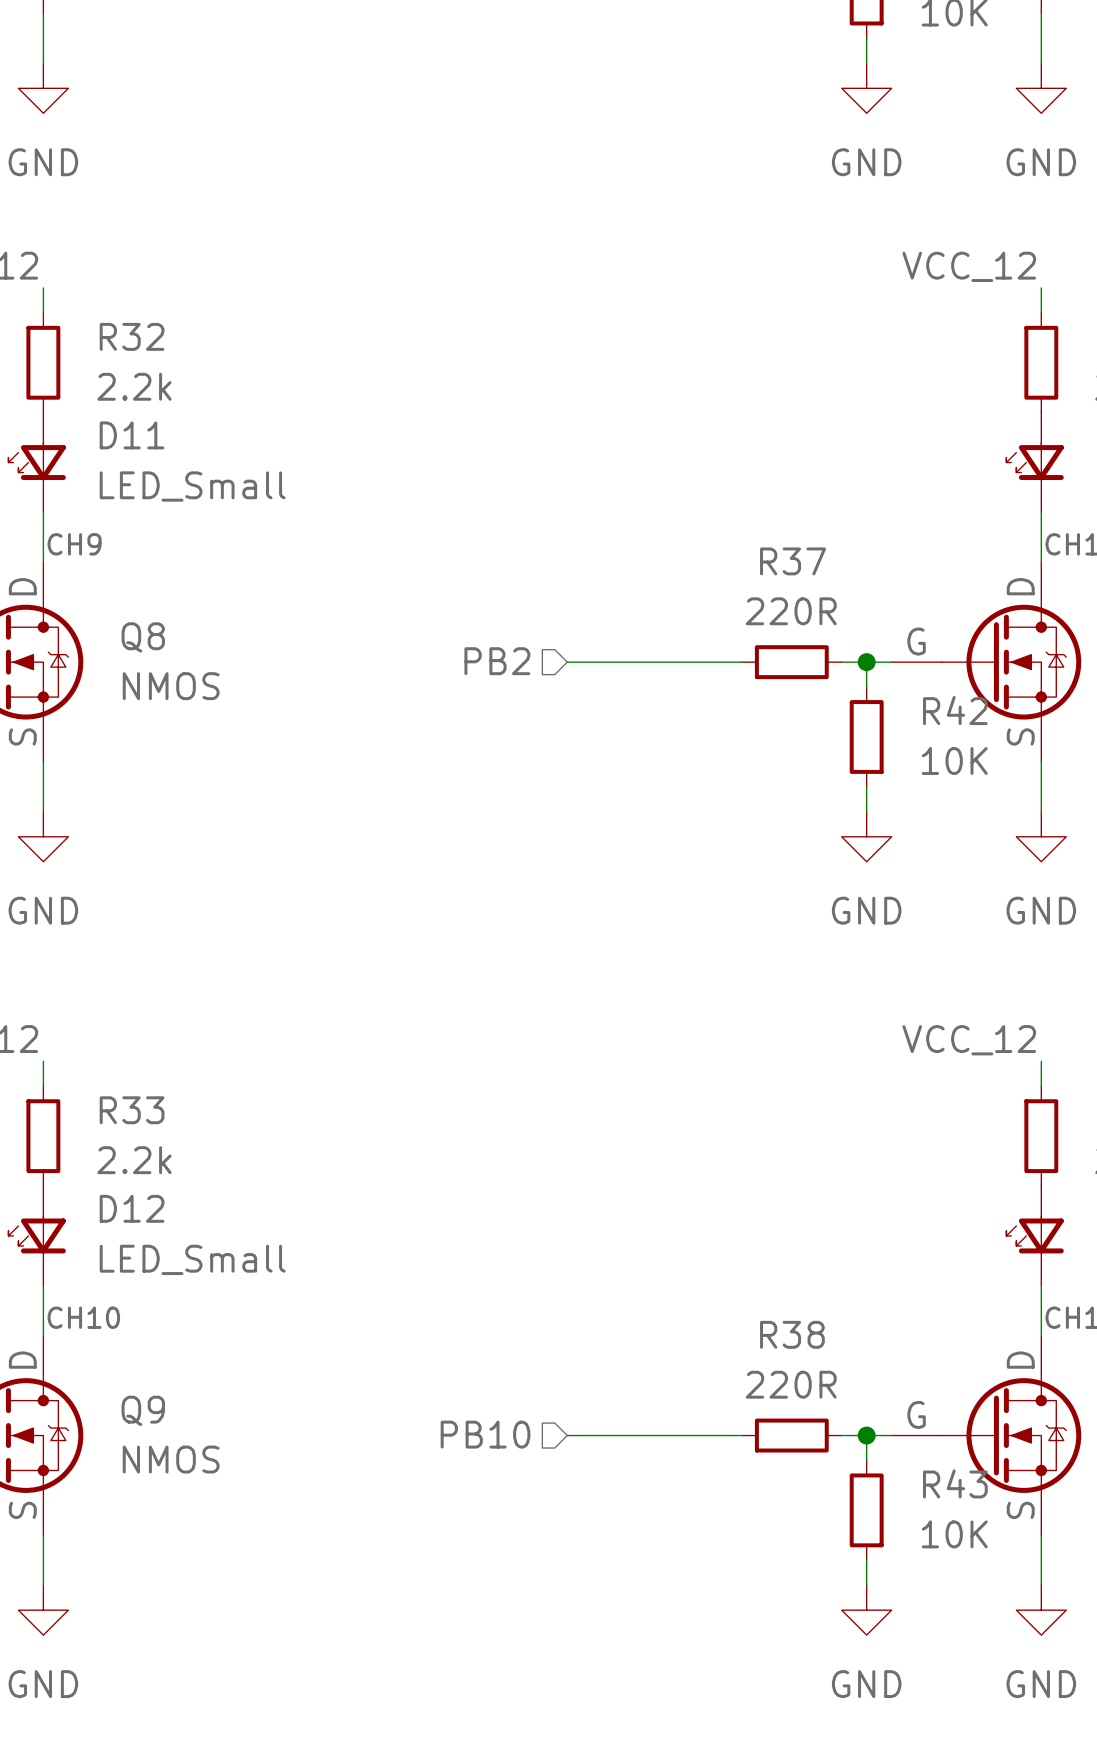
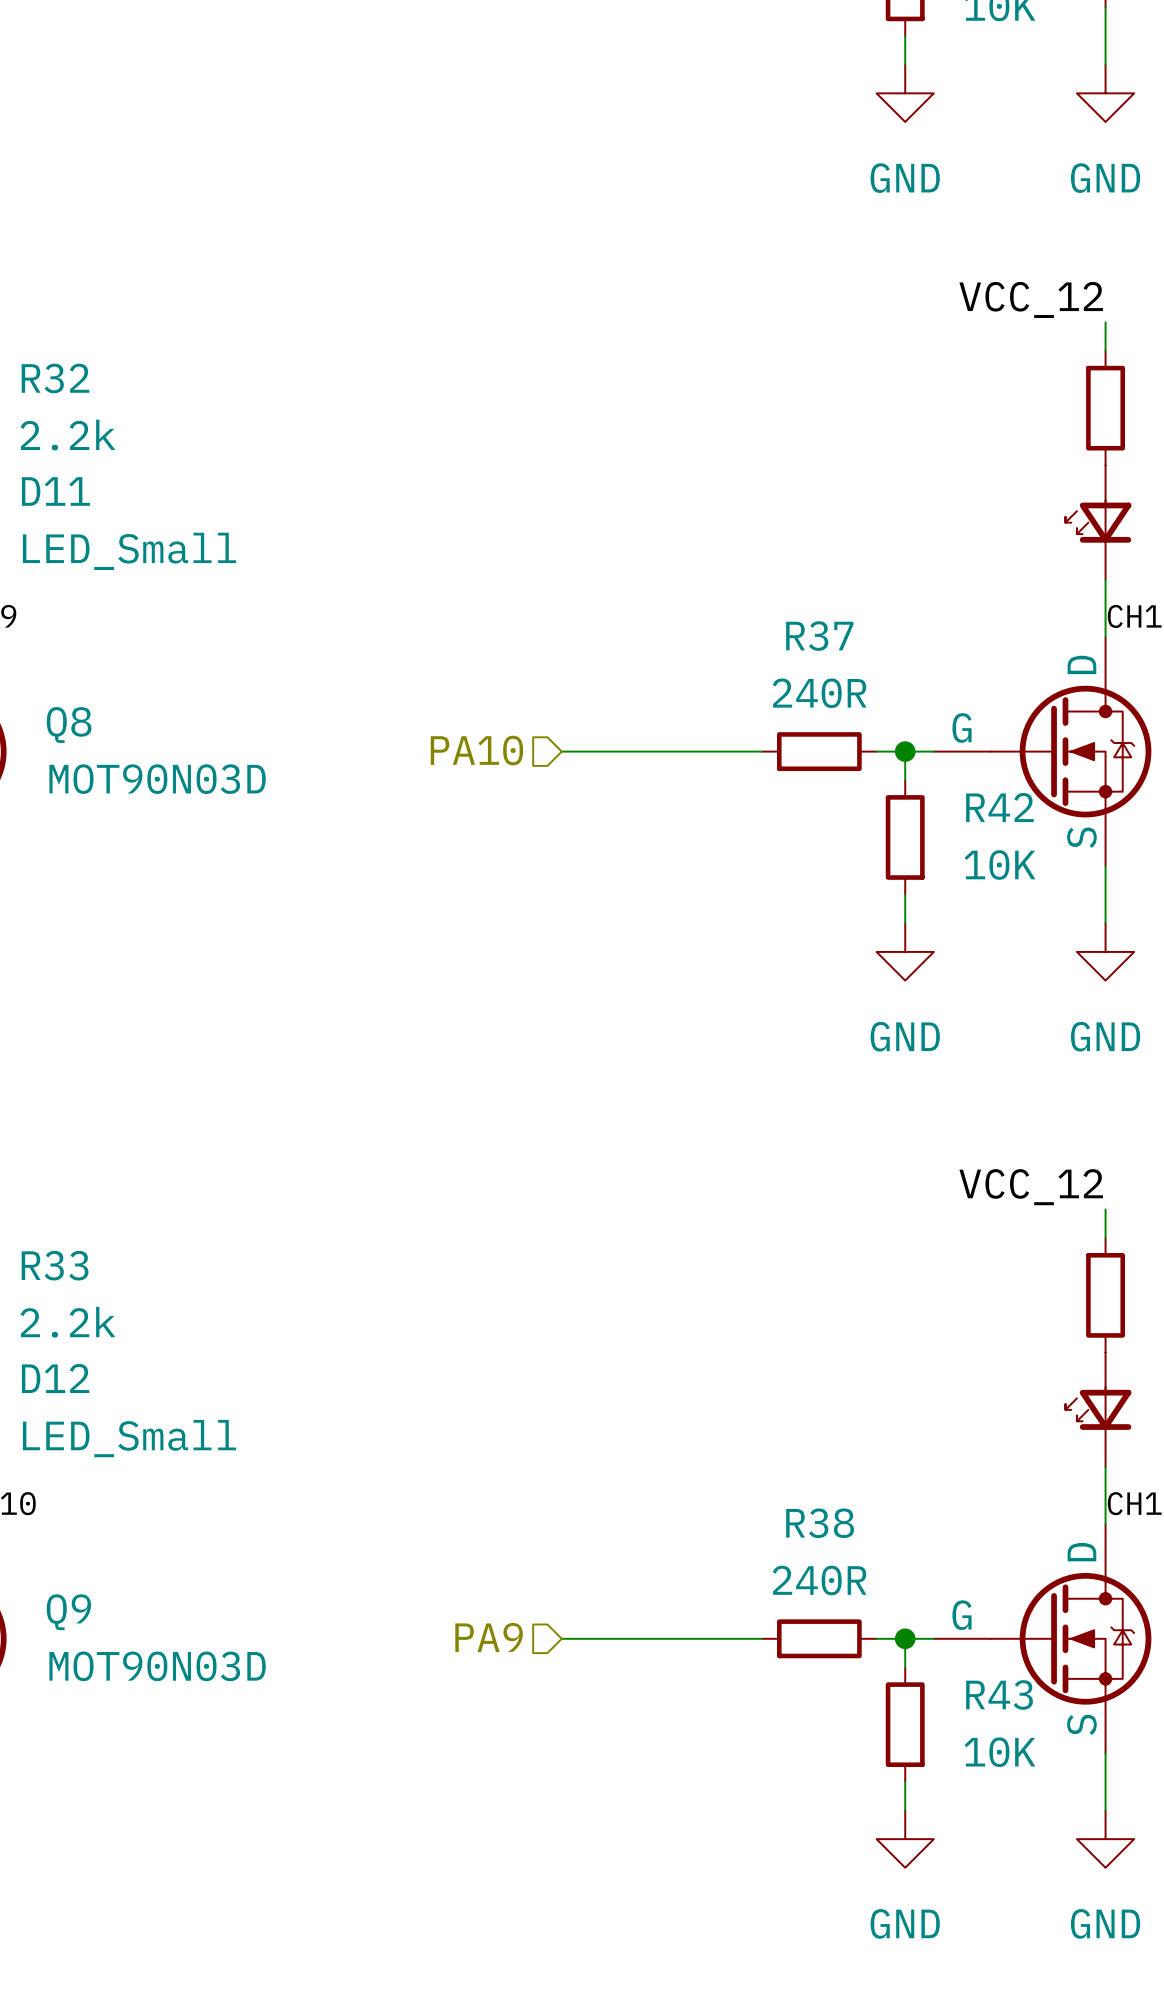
R37 value: 220R (791, 611) -> 240R (819, 693)
hierarchical label: PB2 (497, 661) -> PA10 (476, 750)
Q8 value: NMOS (171, 686) -> MOT90N03D (157, 779)
R38 value: 220R (791, 1384) -> 240R (819, 1580)
hierarchical label: PB10 (485, 1434) -> PA9 (489, 1637)
Q9 value: NMOS (171, 1459) -> MOT90N03D (157, 1666)

